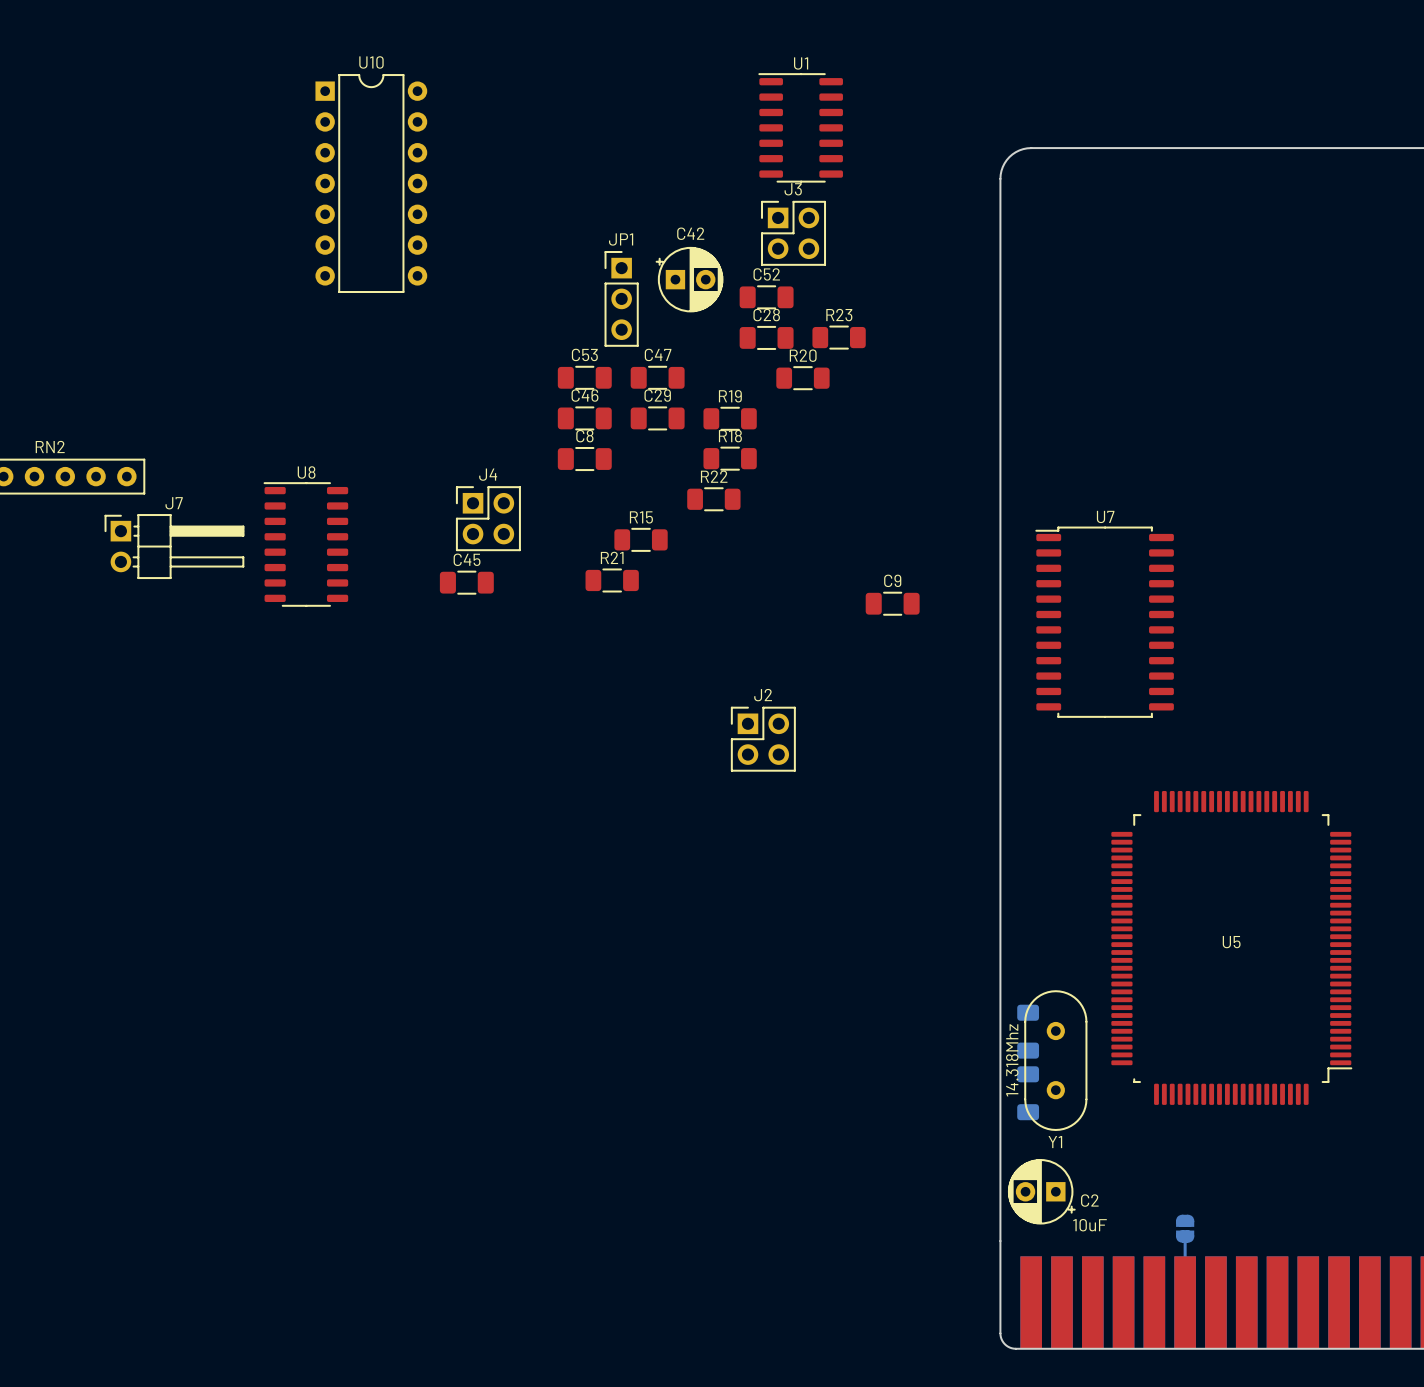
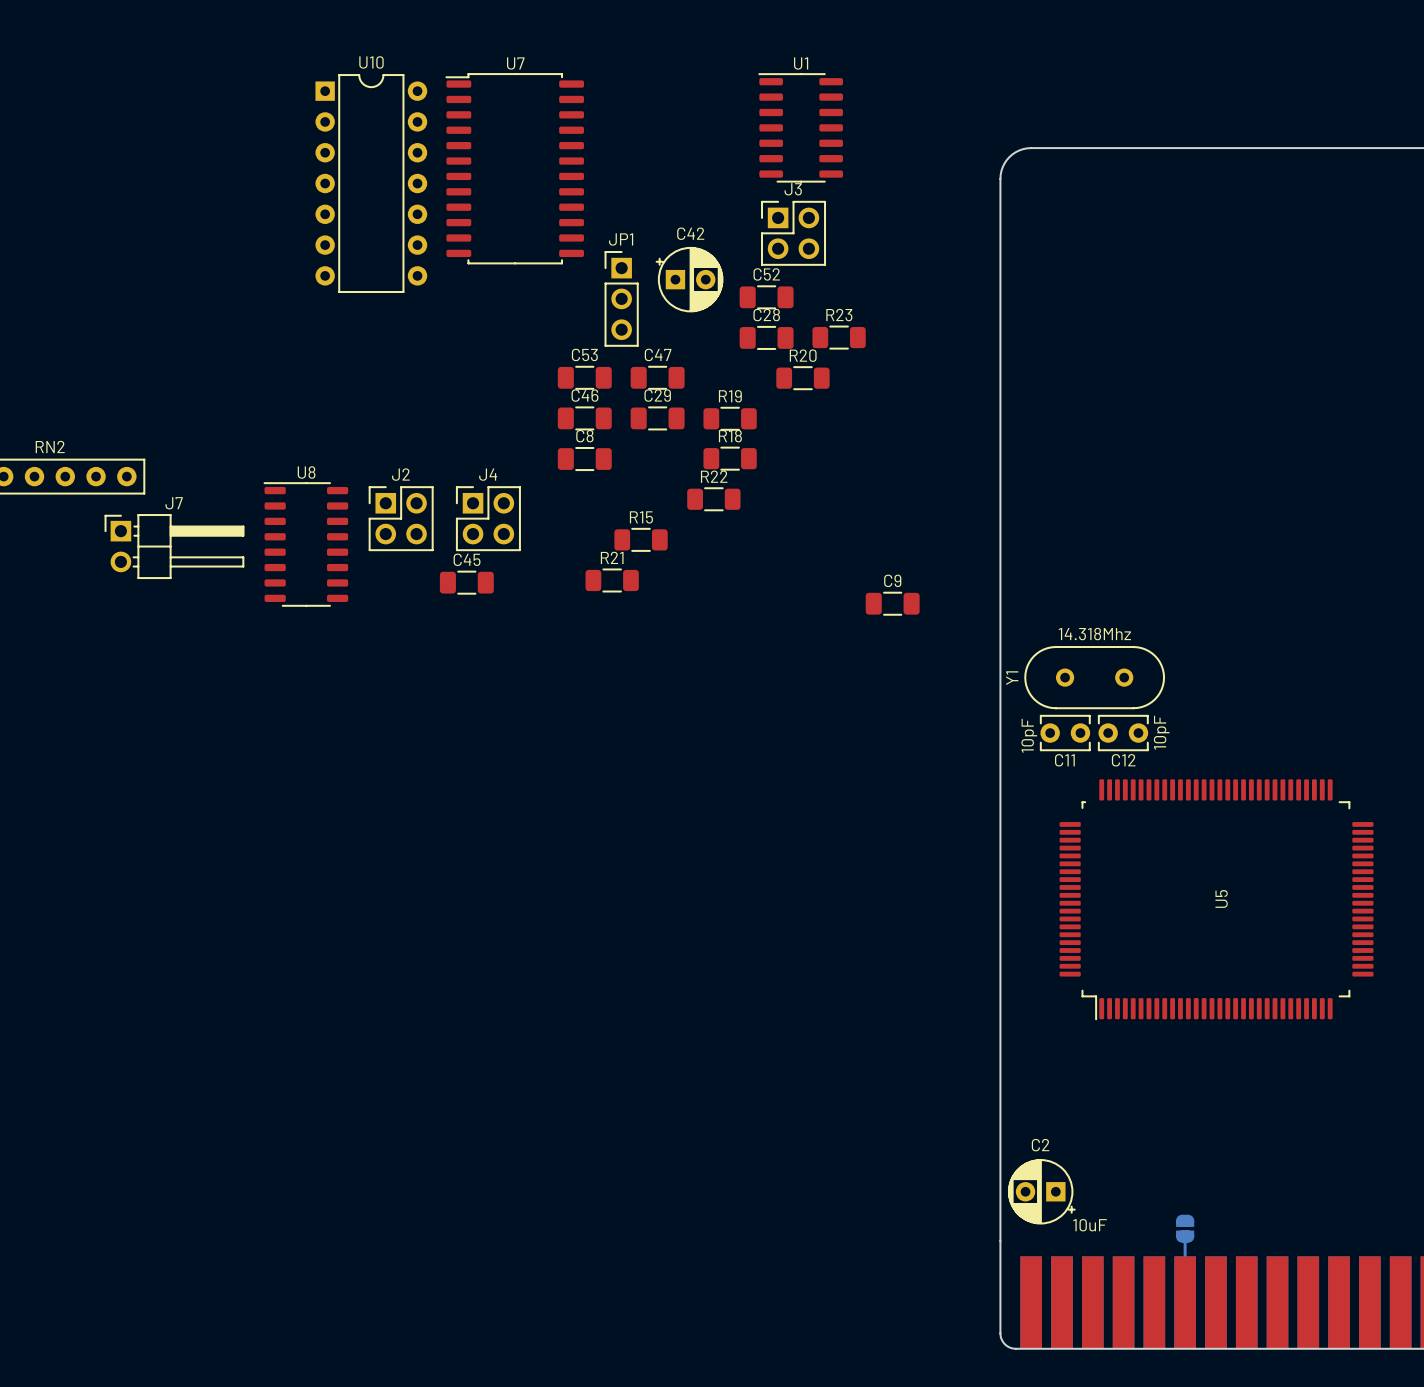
U7 position: (1104, 622) -> (514, 168)
C11: none -> 10pF (1065, 733)
C12: none -> 10pF (1123, 733)
J2 position: (763, 739) -> (401, 518)
U5 rotation: 0° (1231, 947) -> 90° clockwise (1216, 899)
part: (1028, 1031) -> none
Y1 rotation: 0° (1055, 1060) -> 90° clockwise (1094, 677)
Y1 position: (1055, 1060) -> (1094, 677)
part: (1028, 1093) -> none
C2 name position: C2 (1089, 1200) -> C2 (1040, 1145)

